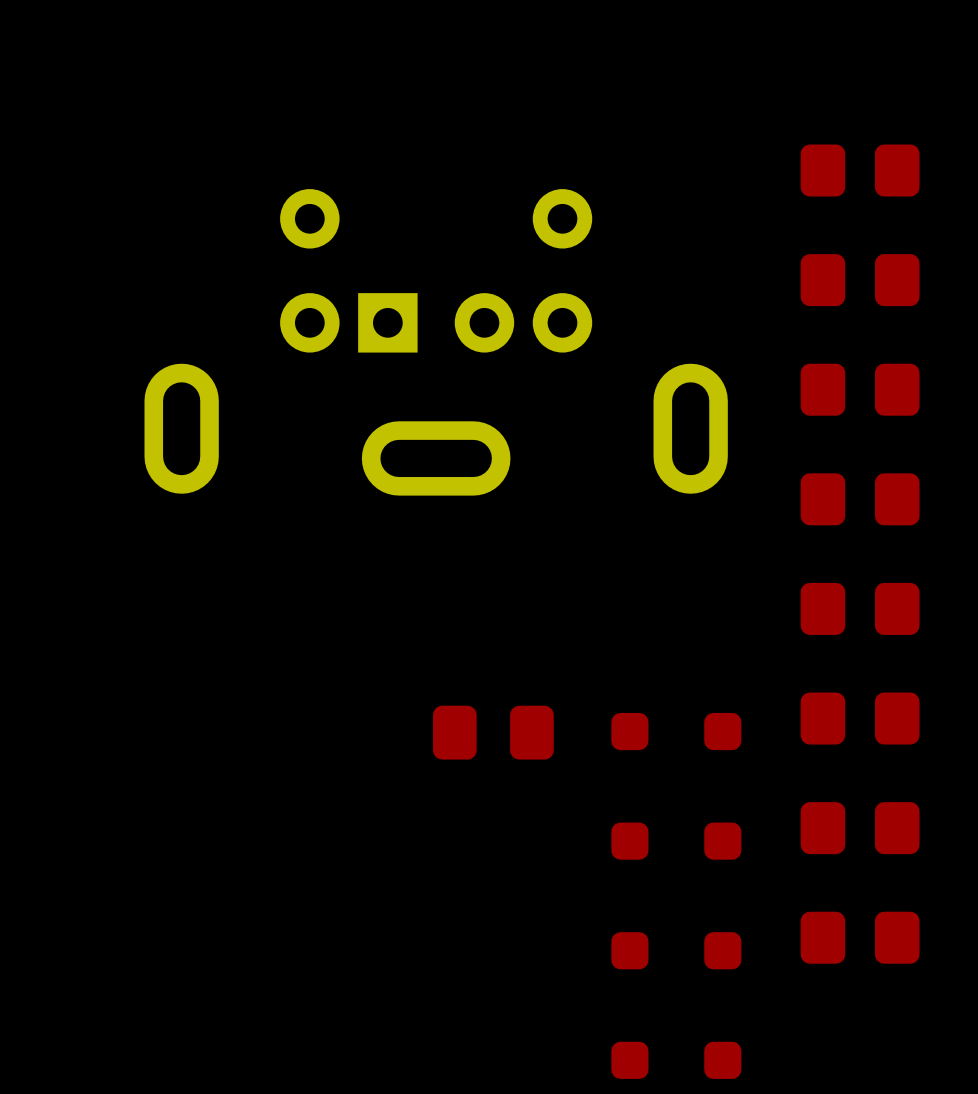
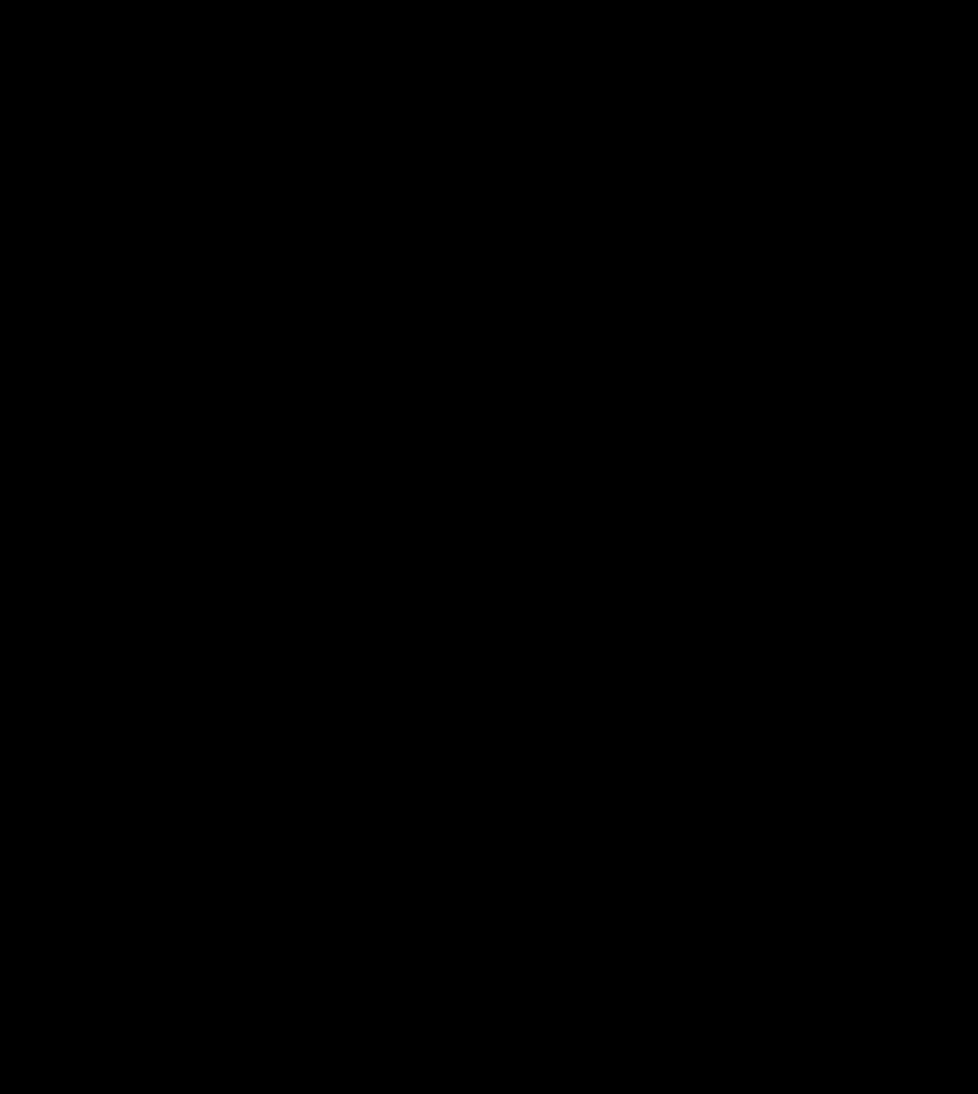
part: (860, 170) -> none
part: (860, 280) -> none
part: (436, 342) -> none
part: (860, 389) -> none
part: (860, 499) -> none
part: (860, 608) -> none
part: (860, 718) -> none
part: (676, 731) -> none
part: (493, 732) -> none
part: (860, 828) -> none
part: (676, 841) -> none
part: (860, 937) -> none
part: (676, 950) -> none
part: (676, 1060) -> none

